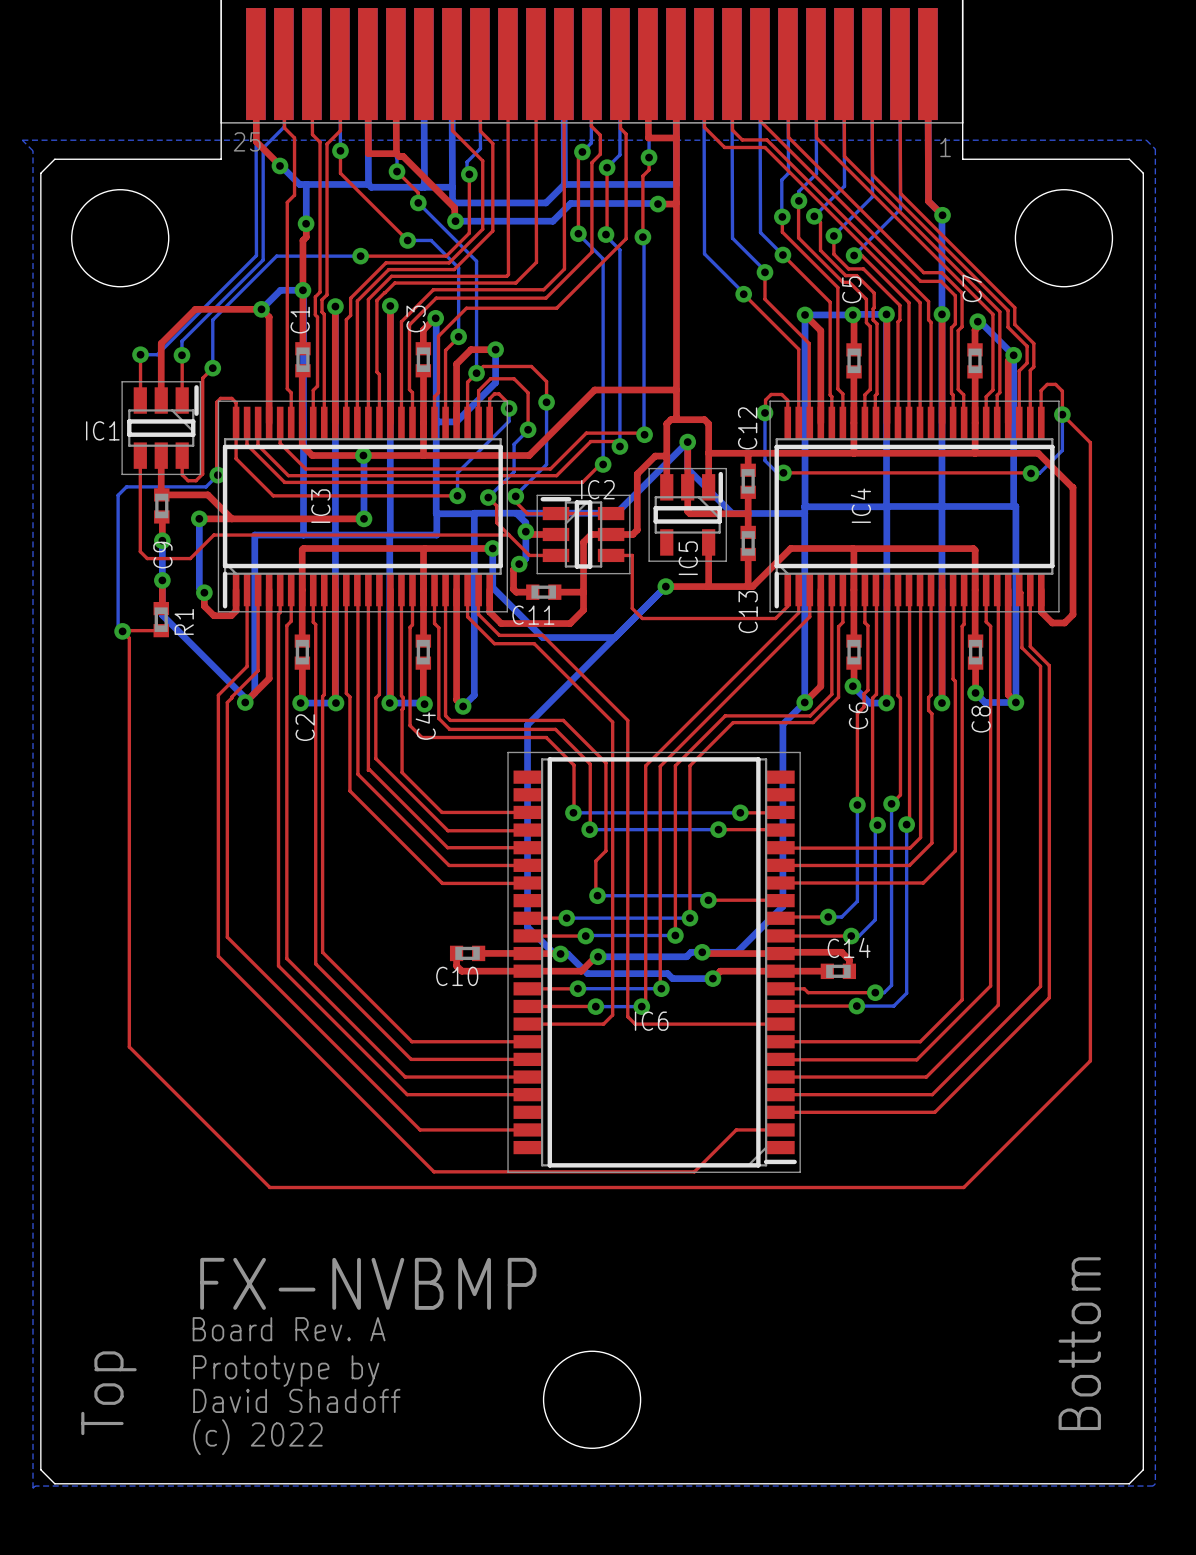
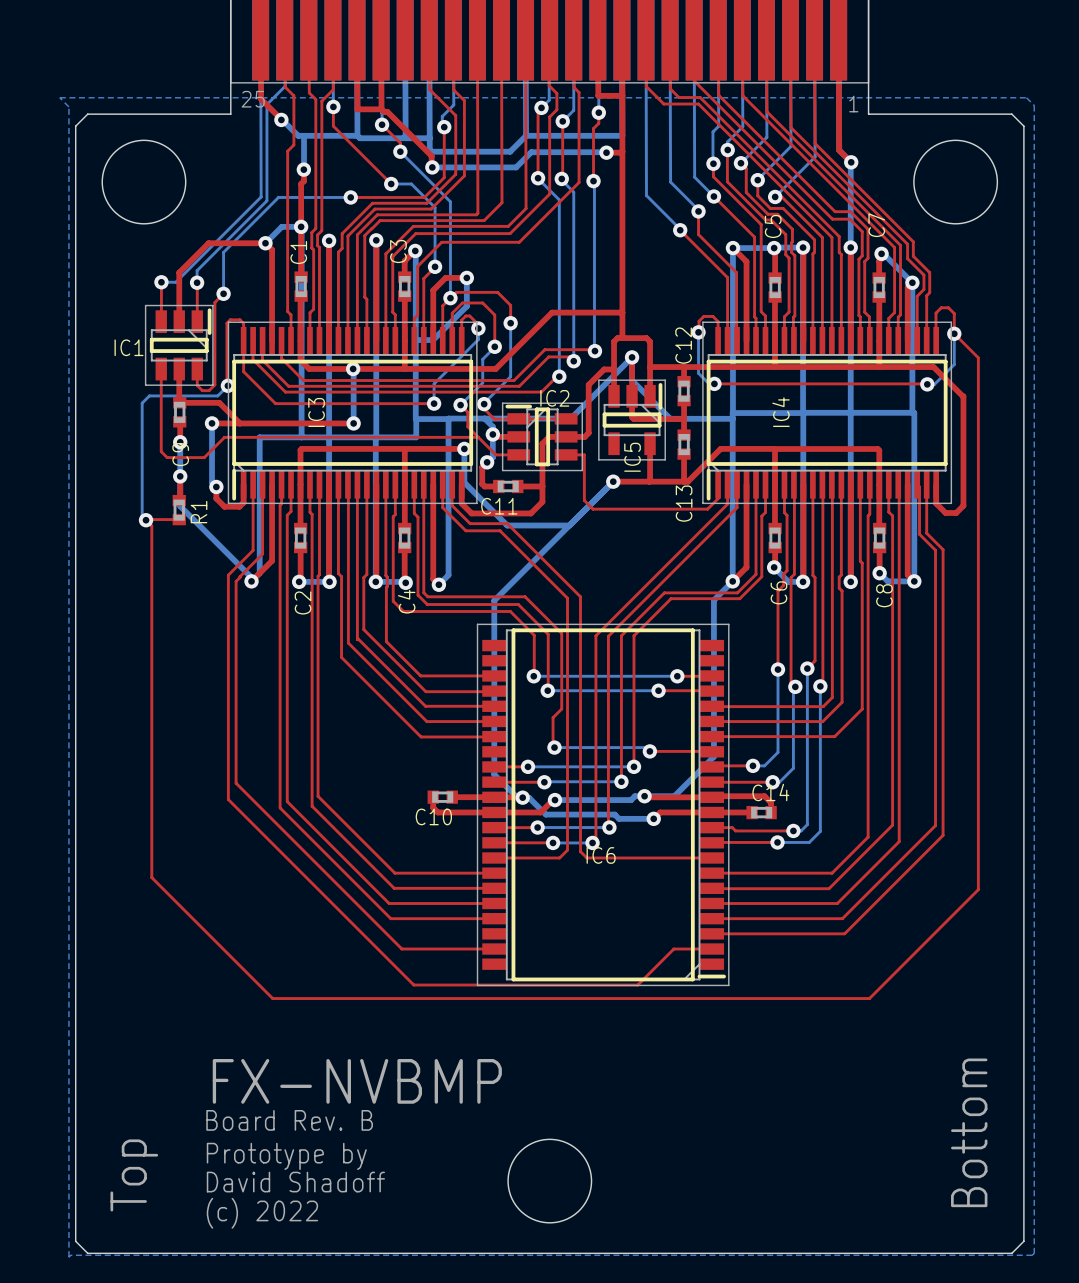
text: Board Rev. A (289, 1329) -> Board Rev. B (289, 1120)

